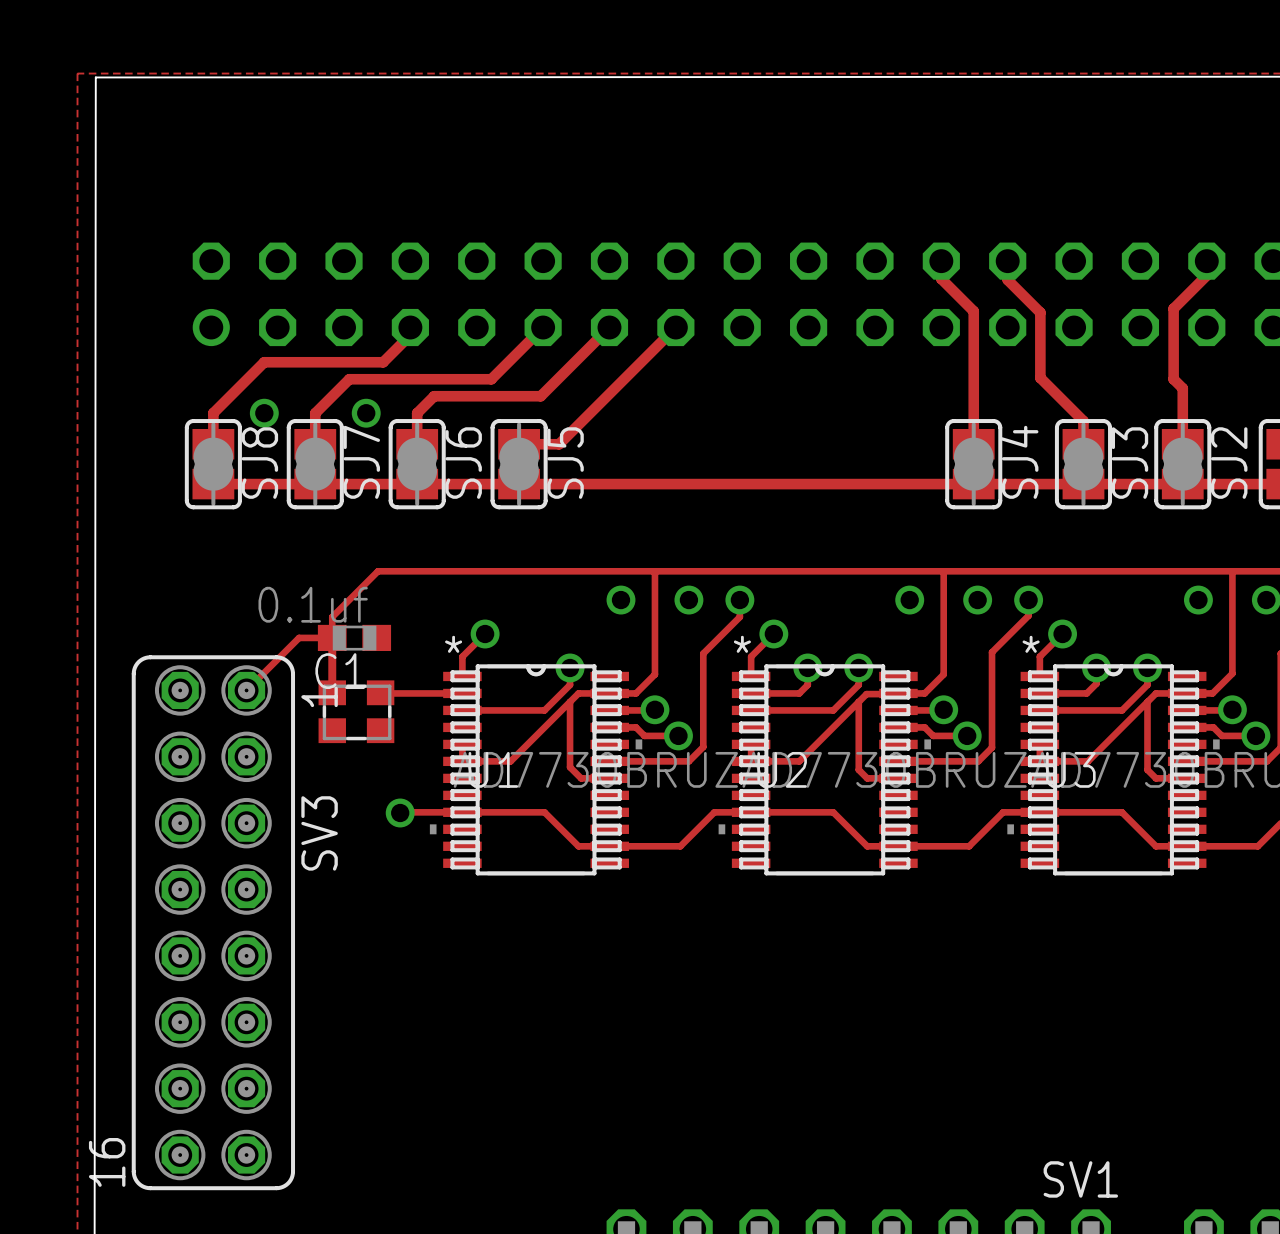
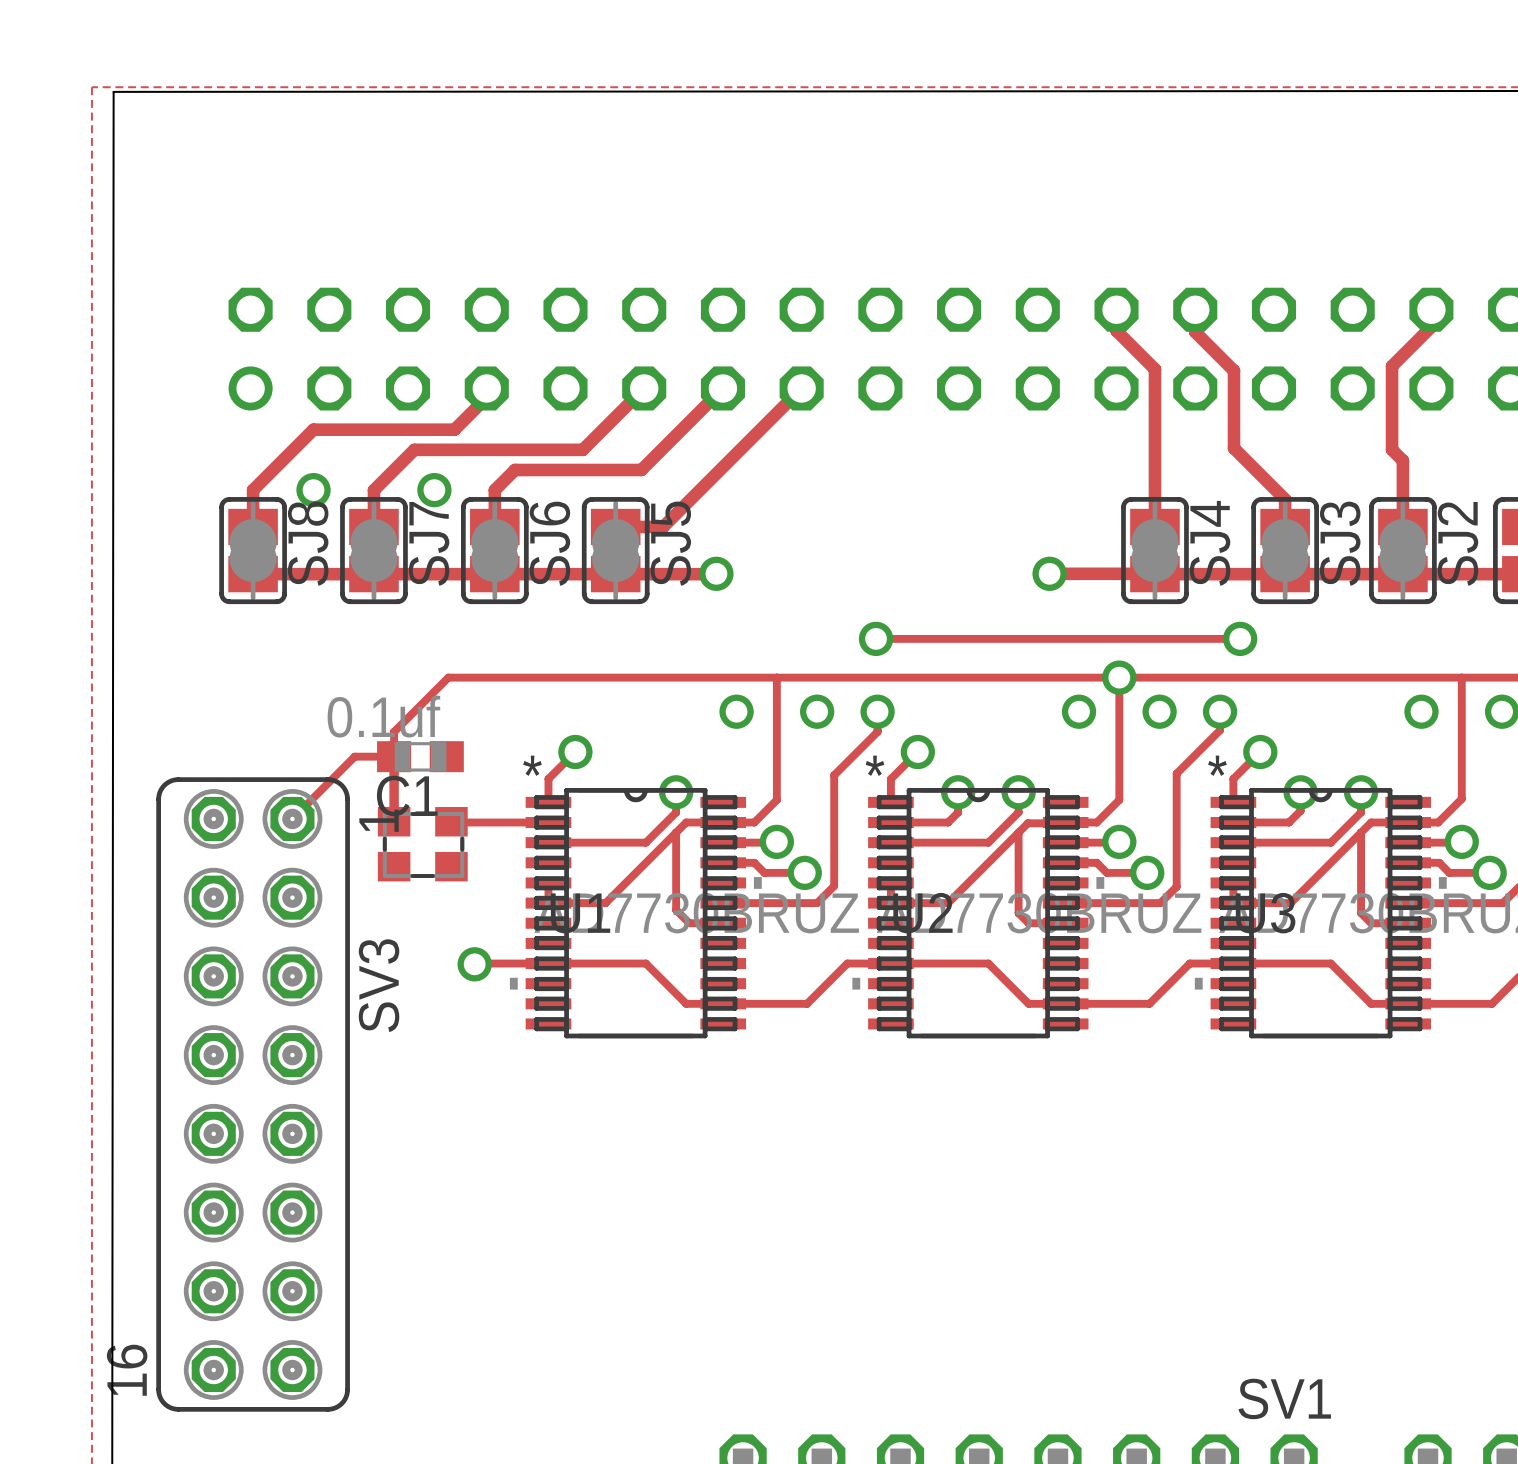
via: none -> (716, 573)
via: none -> (1049, 573)
track: (604, 484) (973, 484) -> (1049, 573) (1154, 573)
track: none -> (876, 638) (1240, 638)
via: none -> (876, 638)
via: none -> (1240, 638)
via: none -> (1119, 677)

